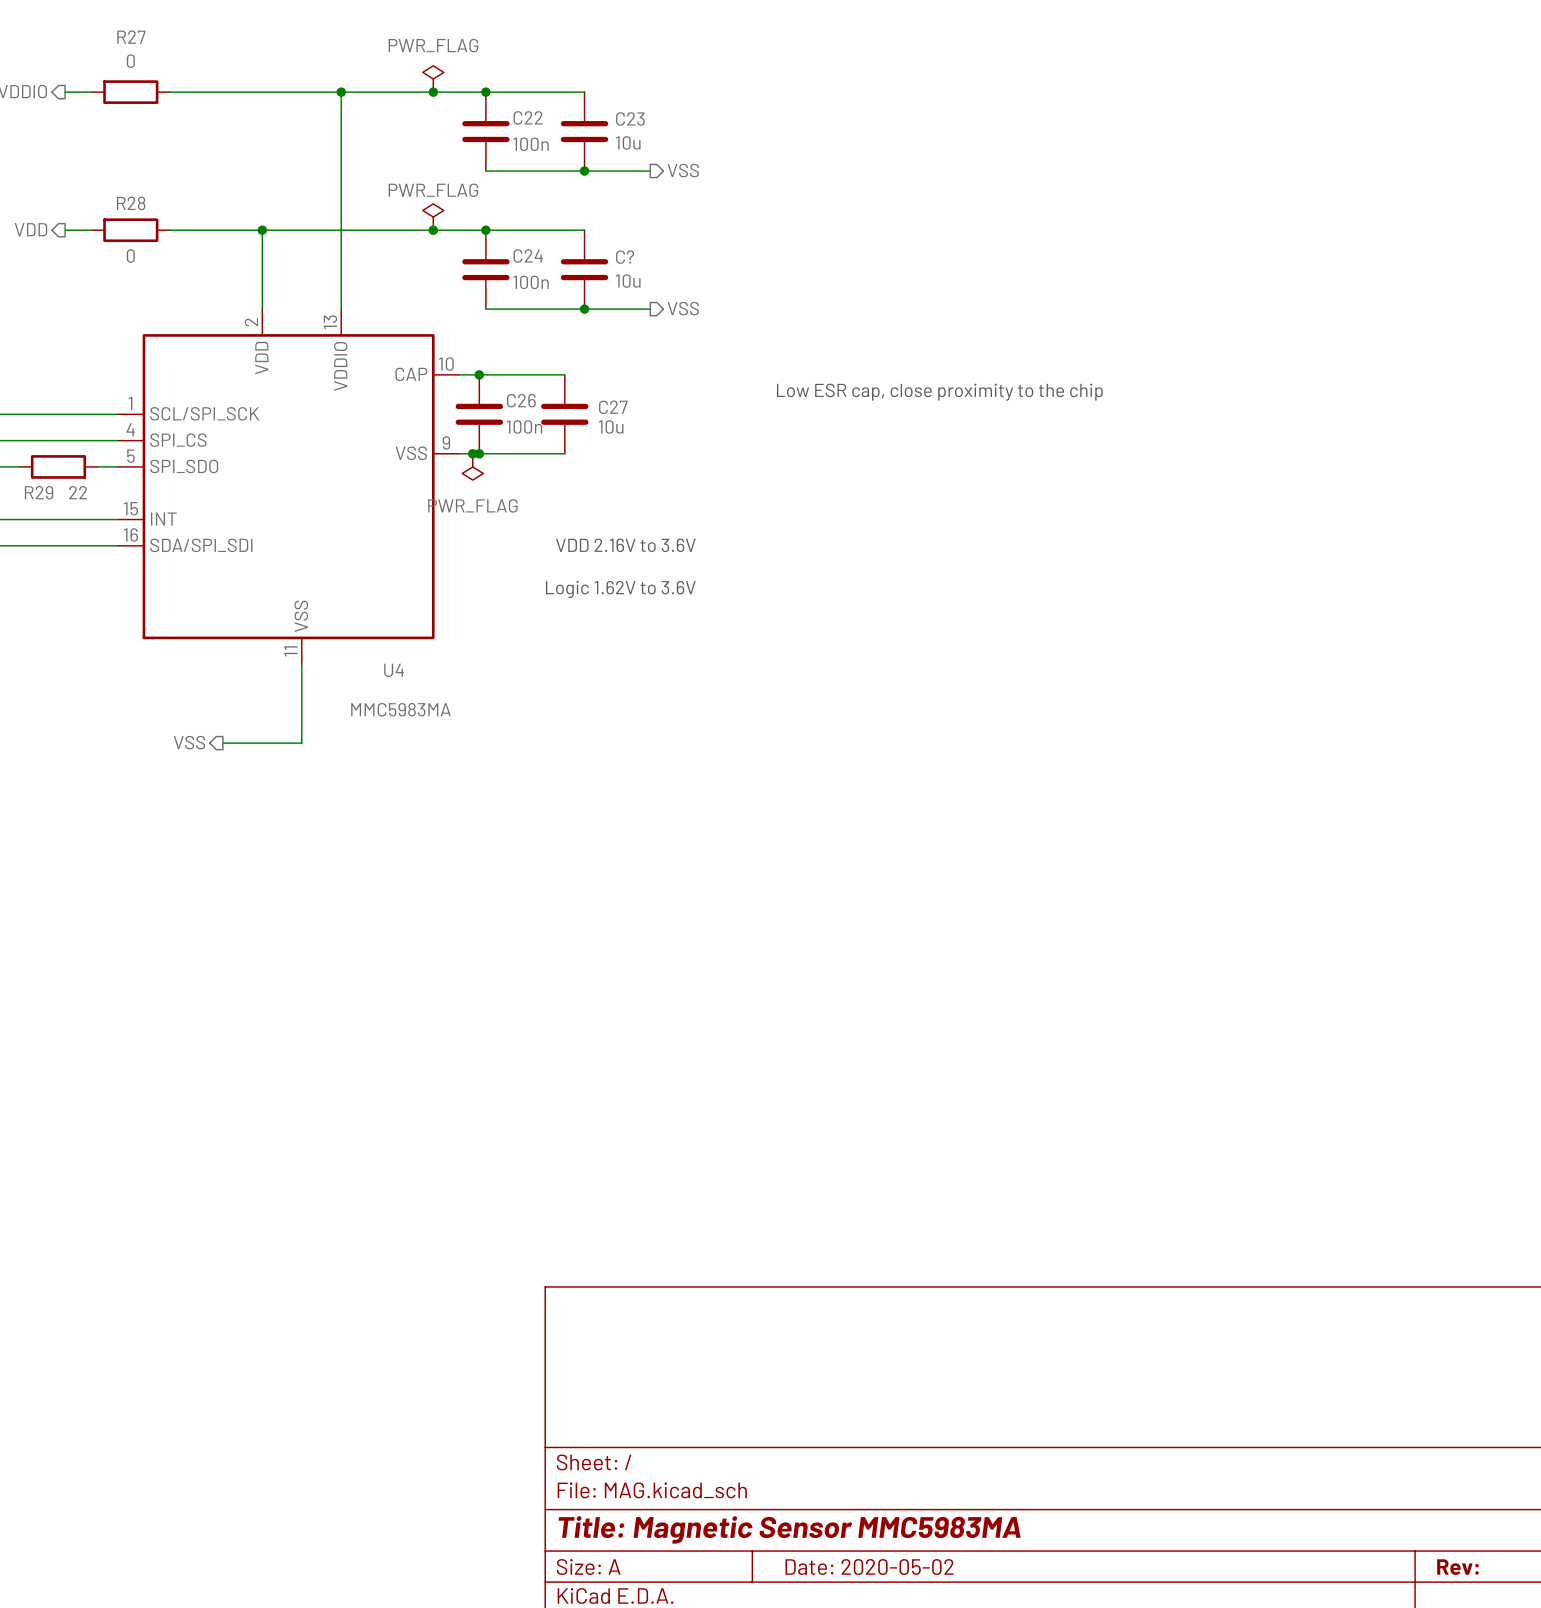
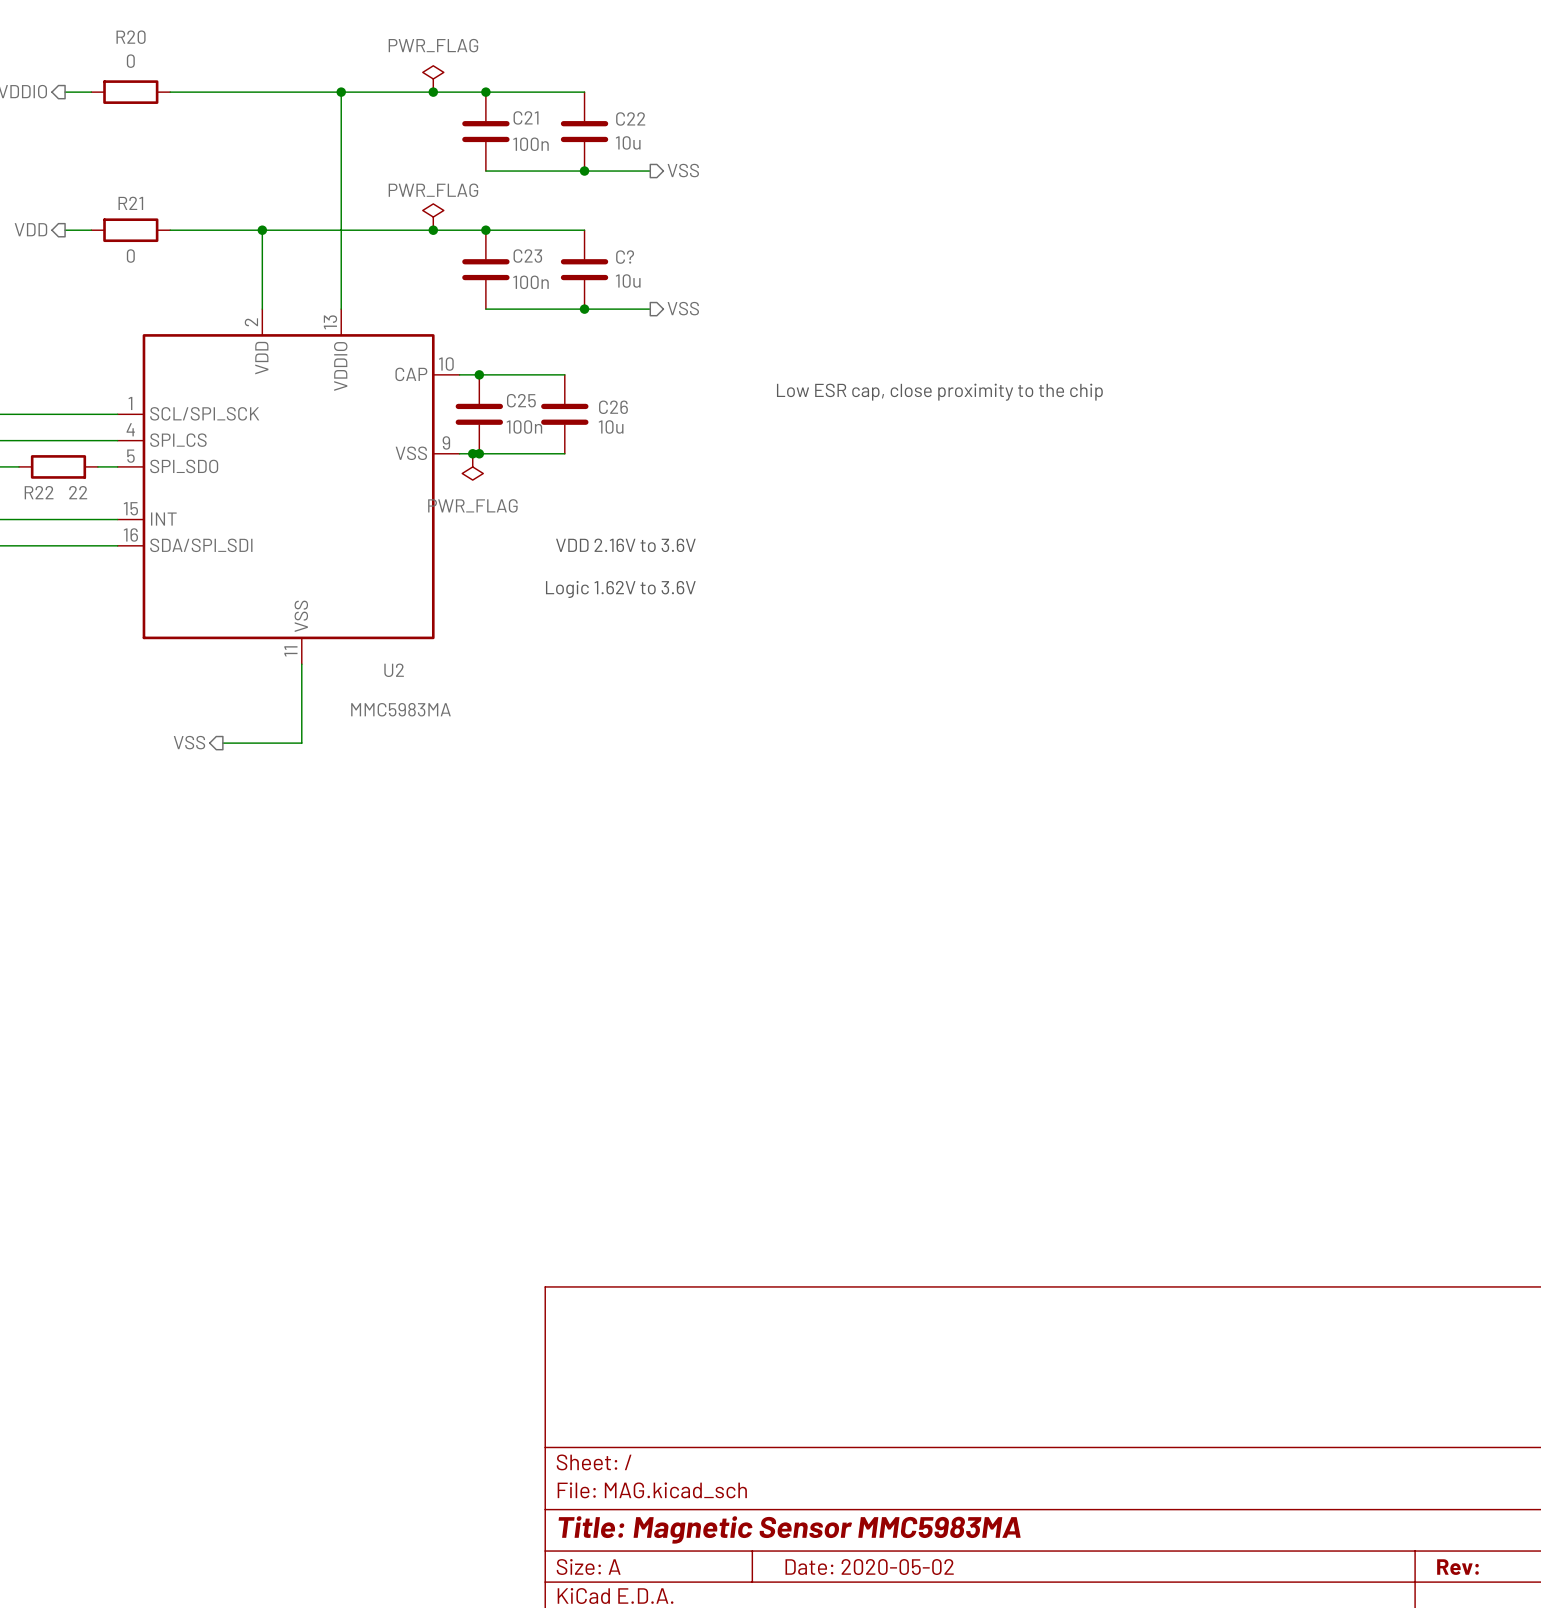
R27 name: R27 (131, 37) -> R20 (131, 37)
C22 name: C22 (528, 117) -> C21 (526, 117)
C23 name: C23 (630, 118) -> C22 (630, 118)
R28 name: R28 (131, 203) -> R21 (130, 203)
C24 name: C24 (528, 256) -> C23 (527, 256)
C26 name: C26 (521, 400) -> C25 (521, 400)
C27 name: C27 (613, 407) -> C26 (613, 407)
R29 name: R29 (39, 492) -> R22 (39, 492)
U4 name: U4 (394, 670) -> U2 (394, 670)

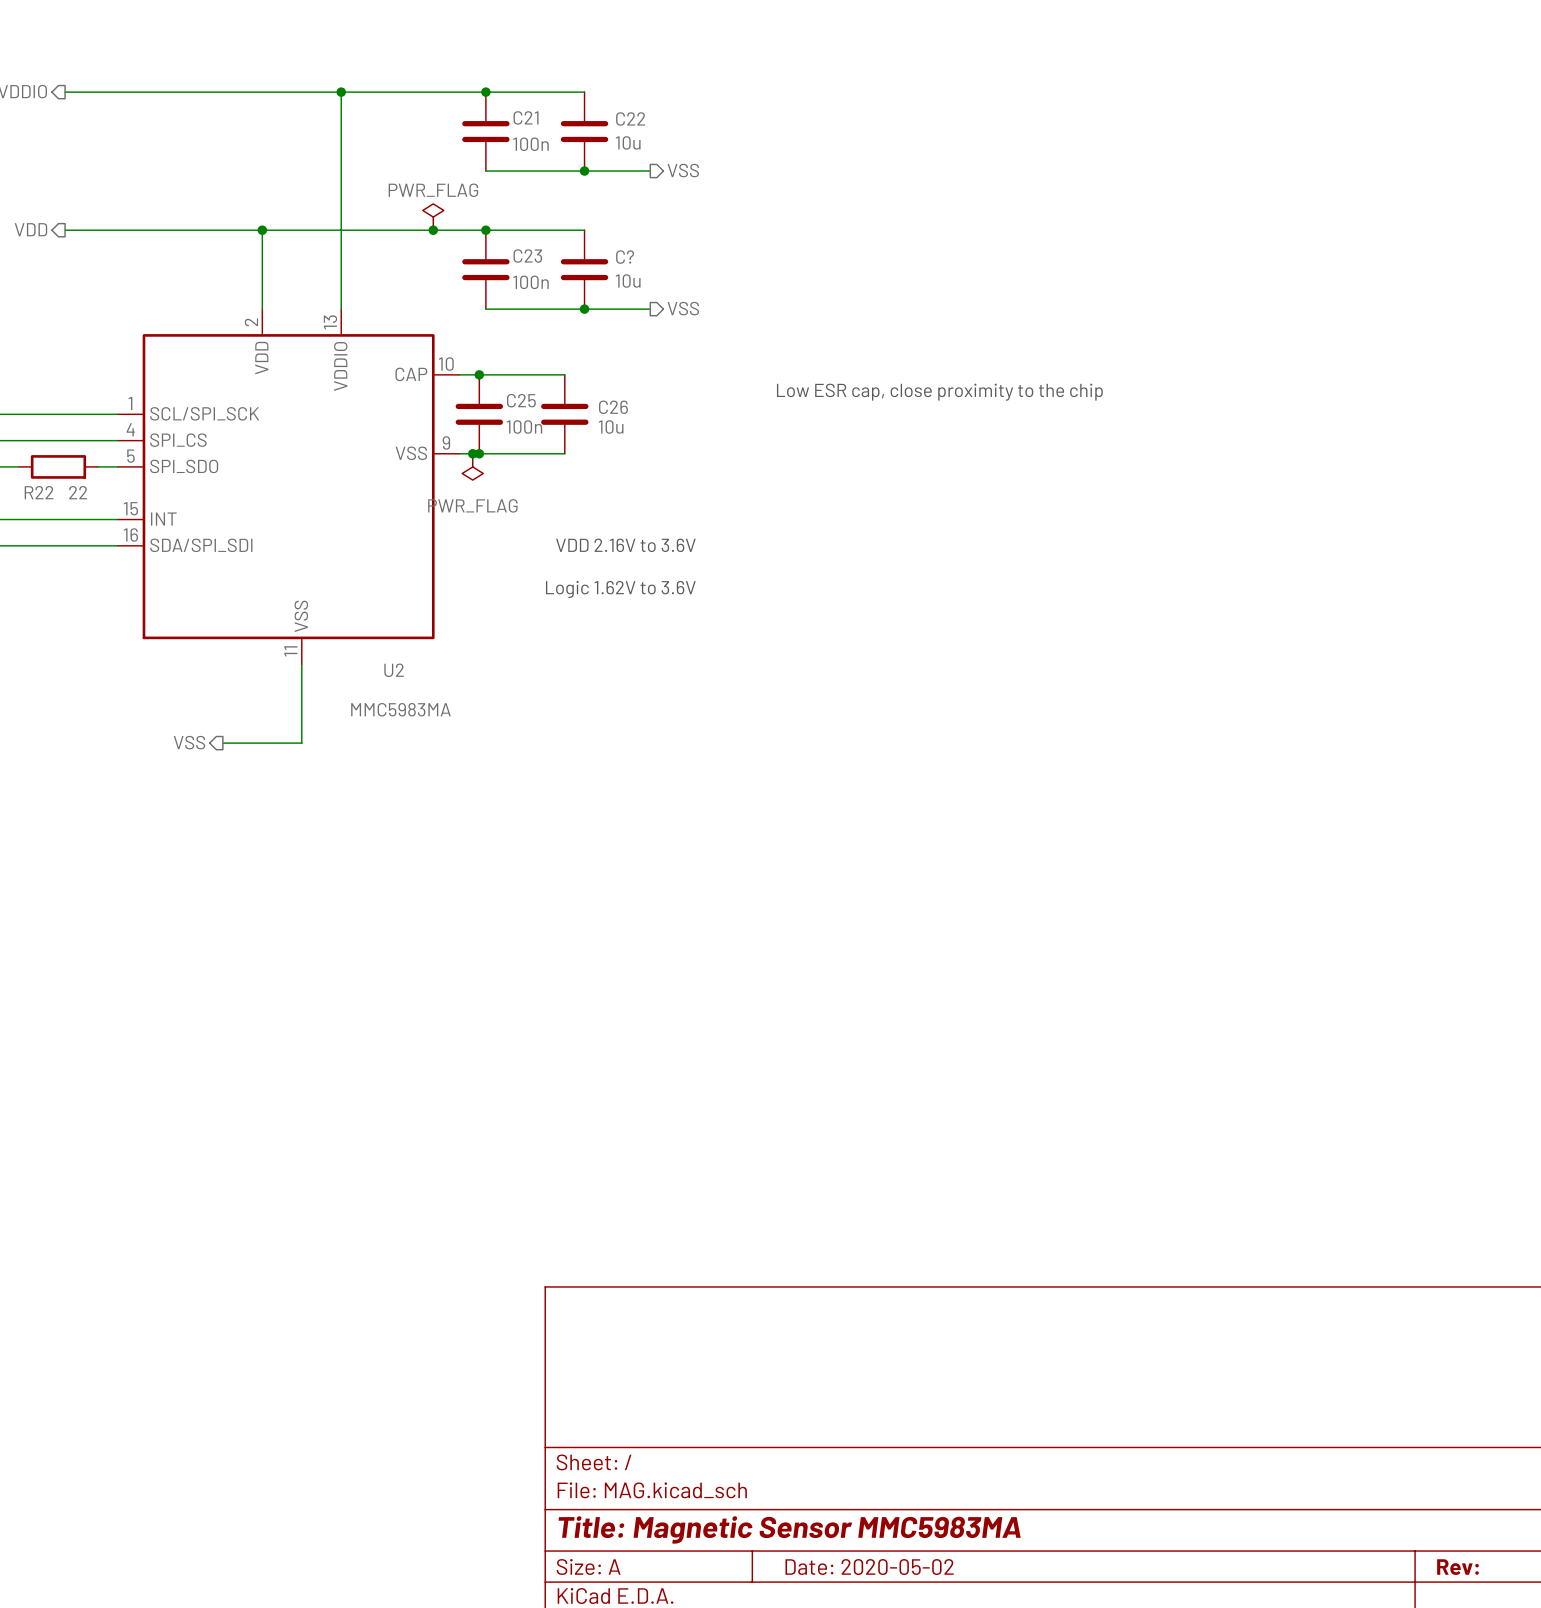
power symbol: PWR_FLAG (433, 78) -> none
wire: none -> (91, 92) (170, 92)
R20: 0 (130, 92) -> none
junction: (433, 92) -> none
wire: none -> (91, 230) (170, 230)
R21: 0 (130, 230) -> none

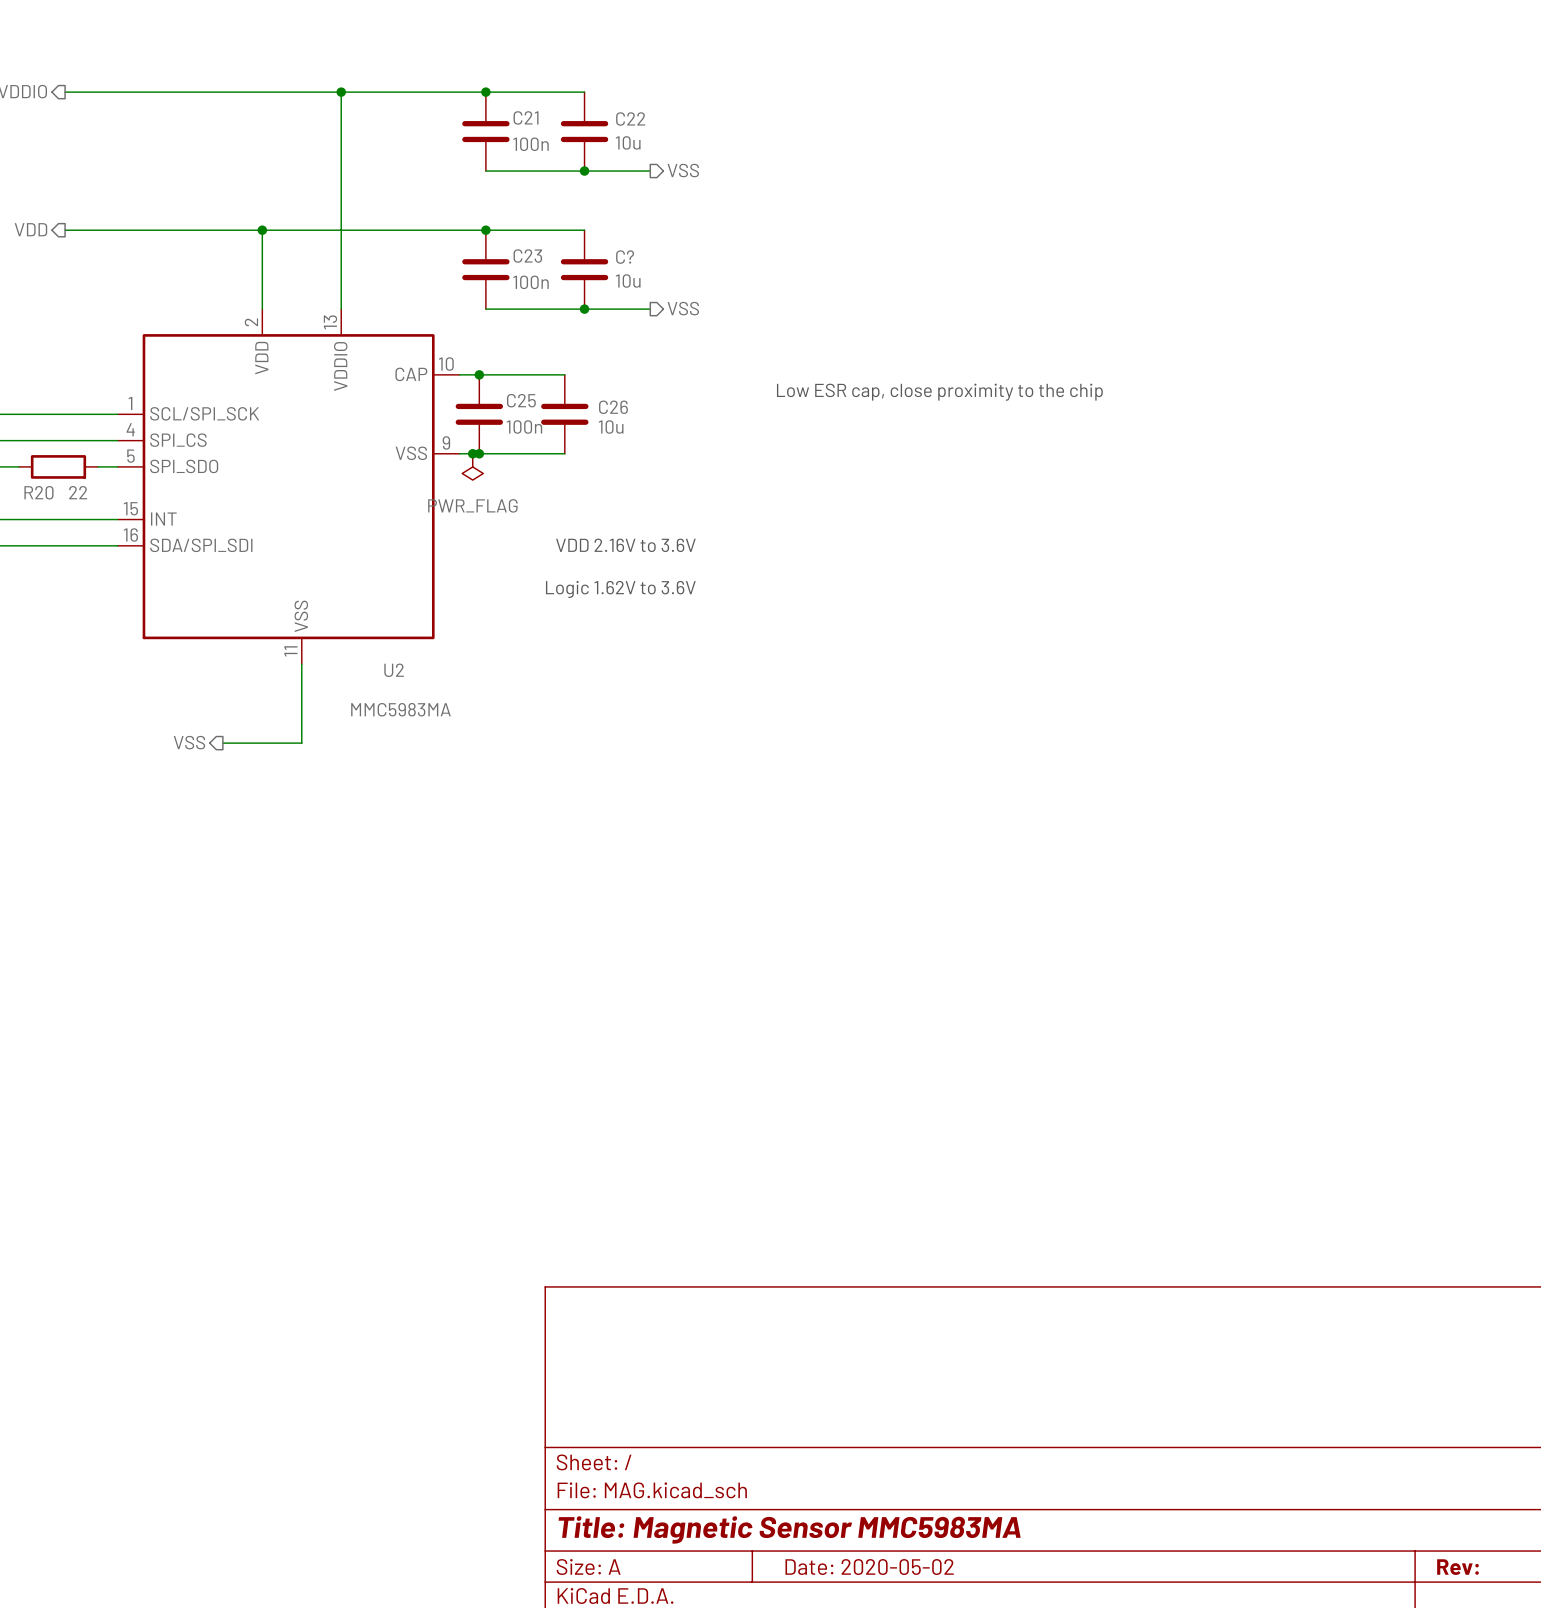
power symbol: PWR_FLAG (433, 217) -> none
junction: (433, 230) -> none
R22 name: R22 (39, 492) -> R20 (38, 492)

